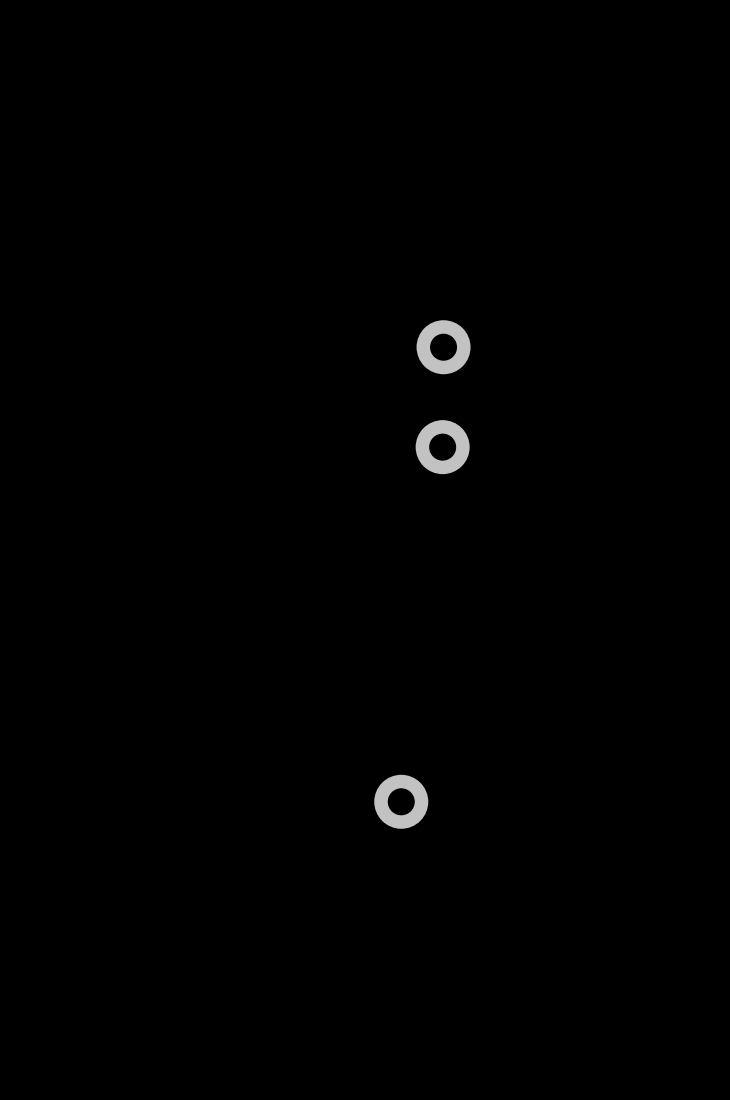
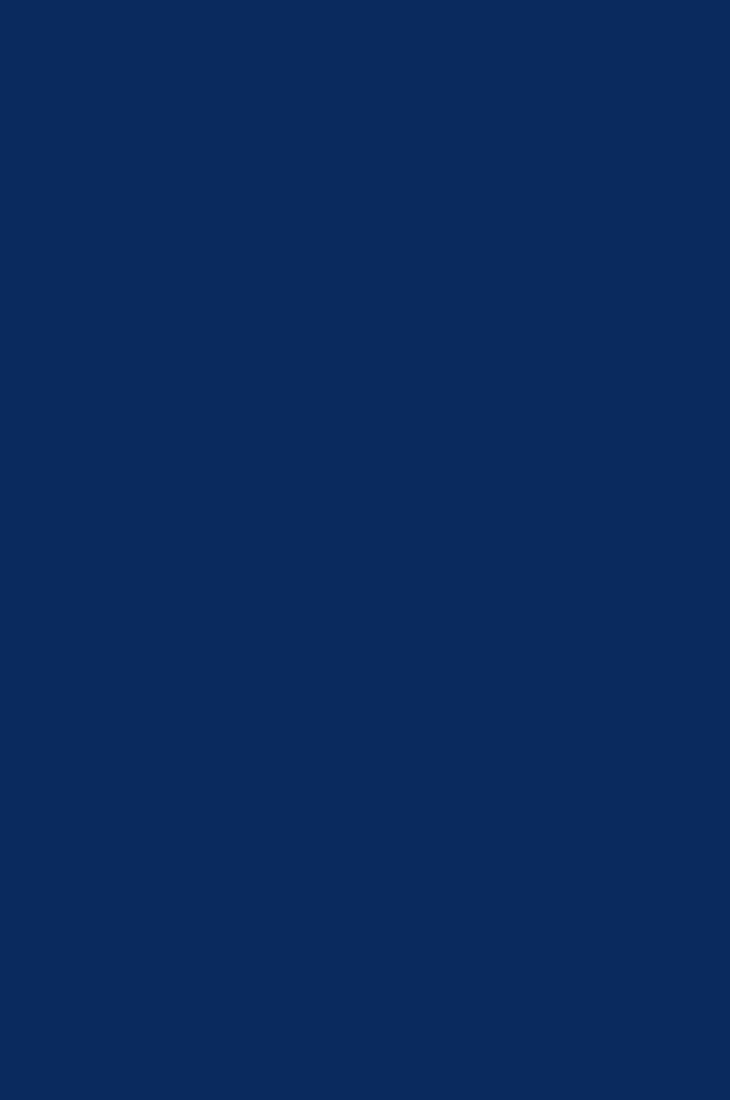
via: (443, 347) -> none
via: (442, 447) -> none
via: (401, 801) -> none

